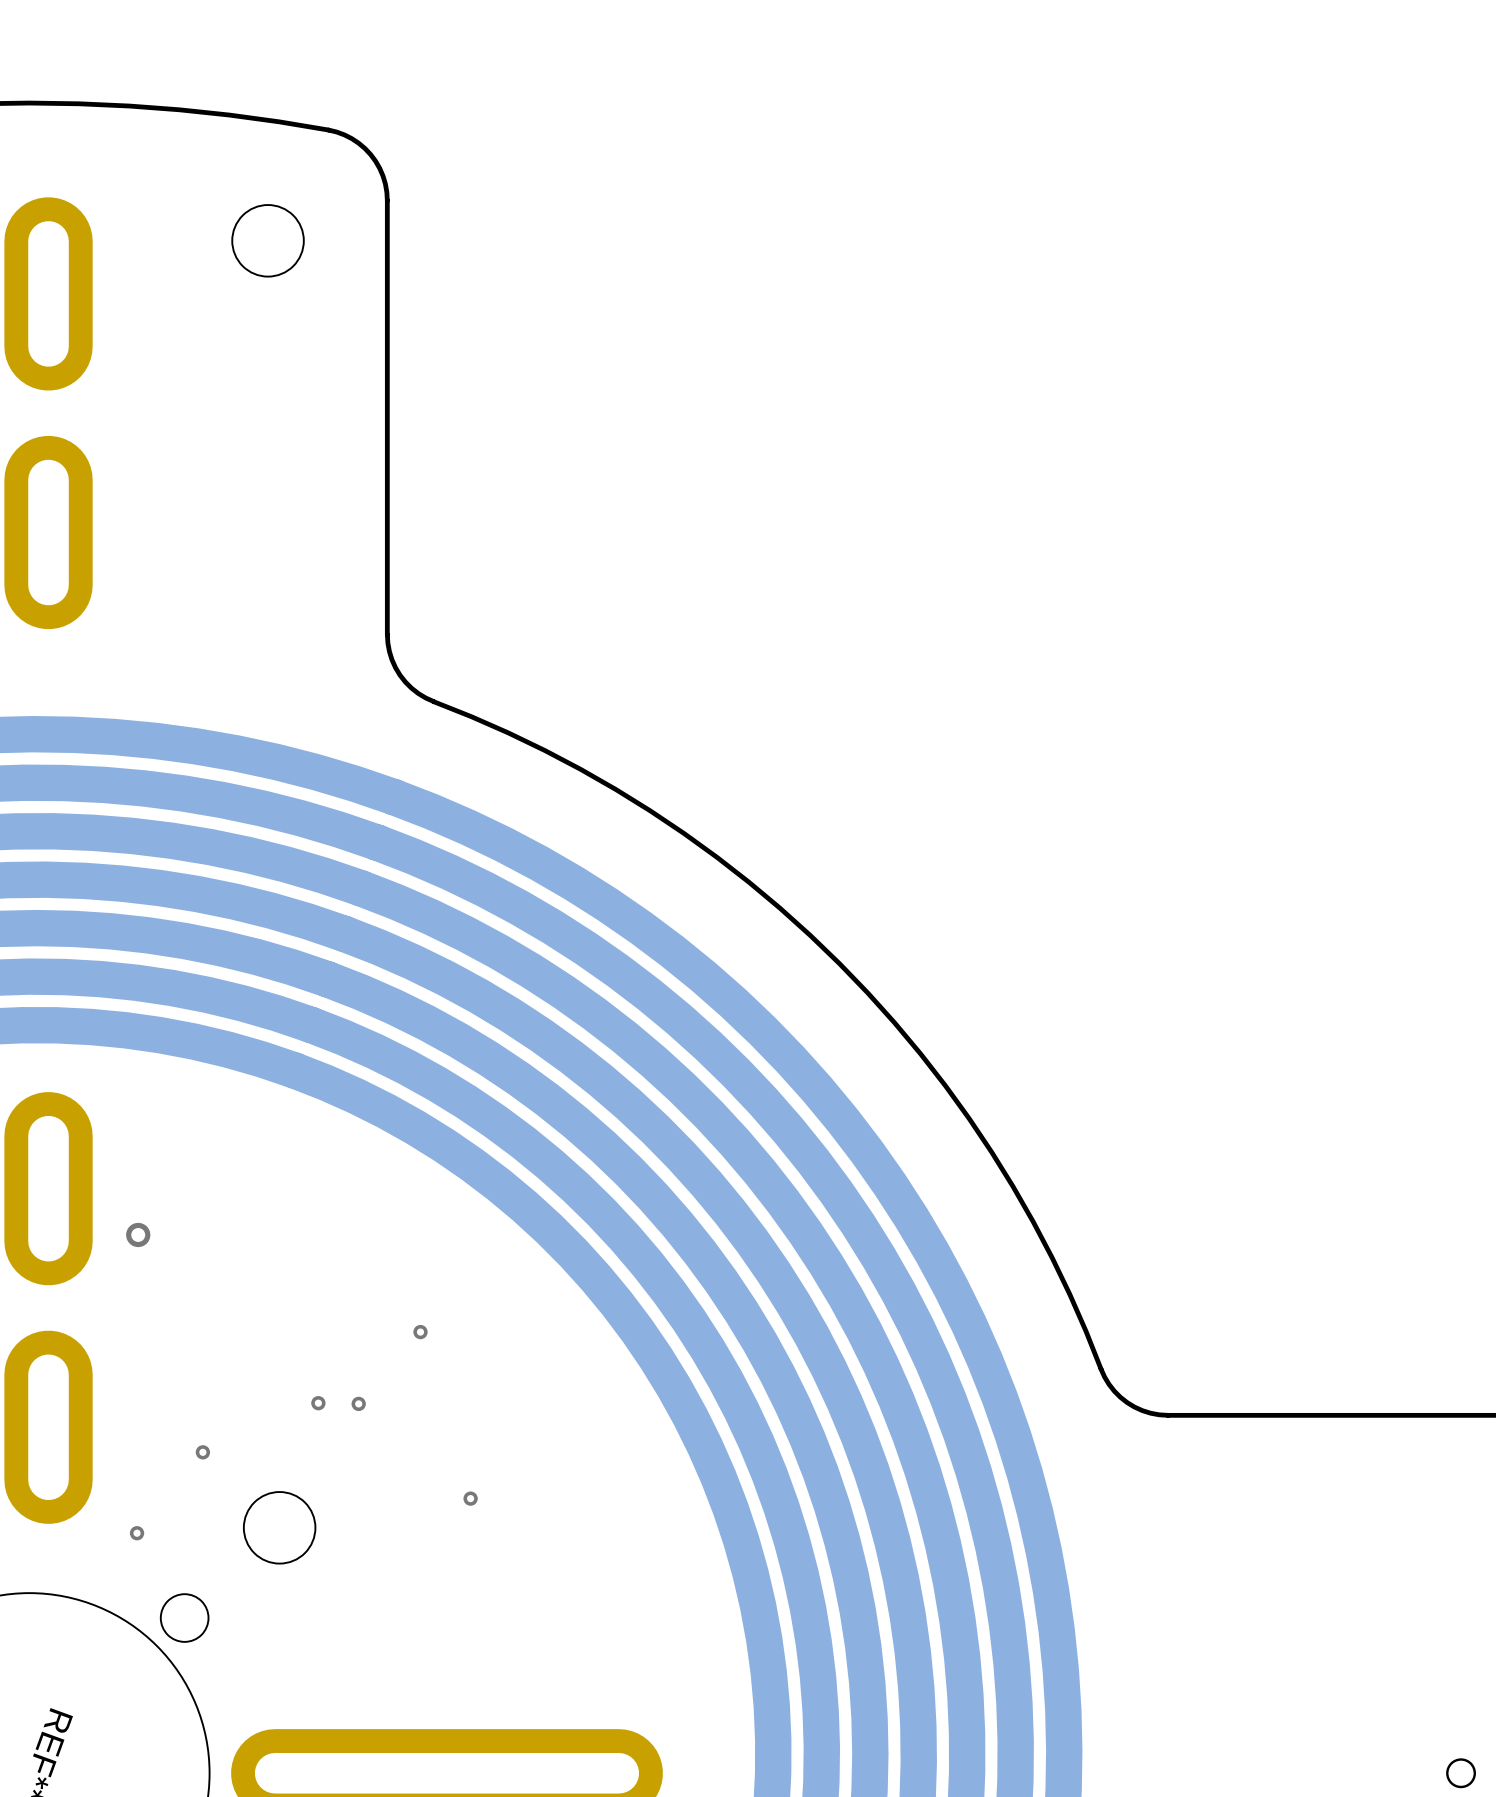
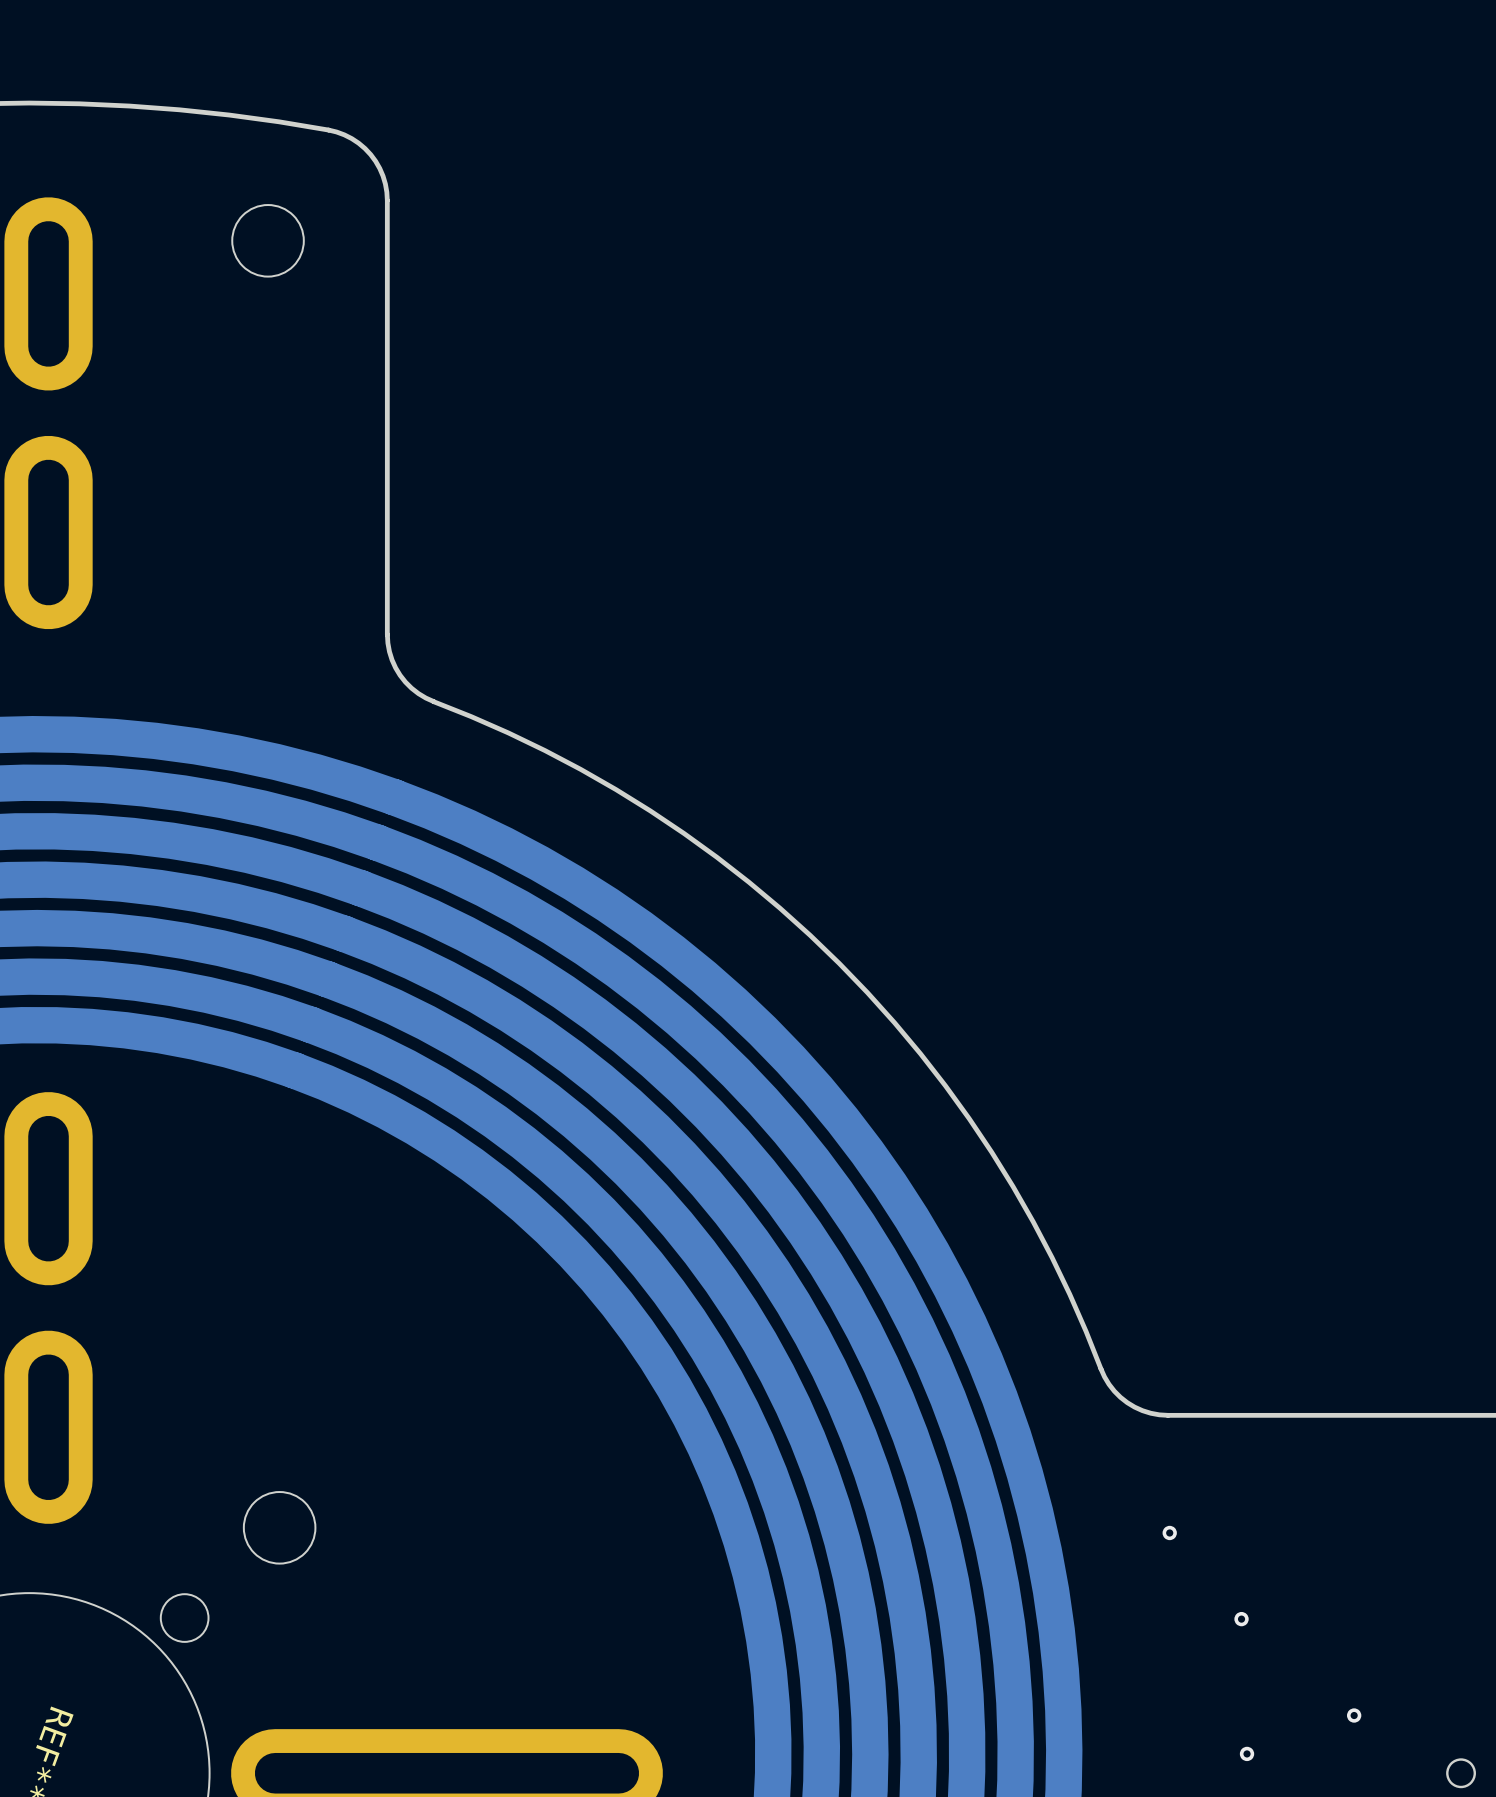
via: (138, 1234) -> none
via: (420, 1332) -> none
via: (318, 1403) -> none
via: (358, 1403) -> none
via: (202, 1452) -> none
via: (470, 1498) -> none
via: none -> (1169, 1532)
via: (137, 1533) -> none
via: none -> (1241, 1619)
via: none -> (1354, 1715)
via: none -> (1247, 1753)

